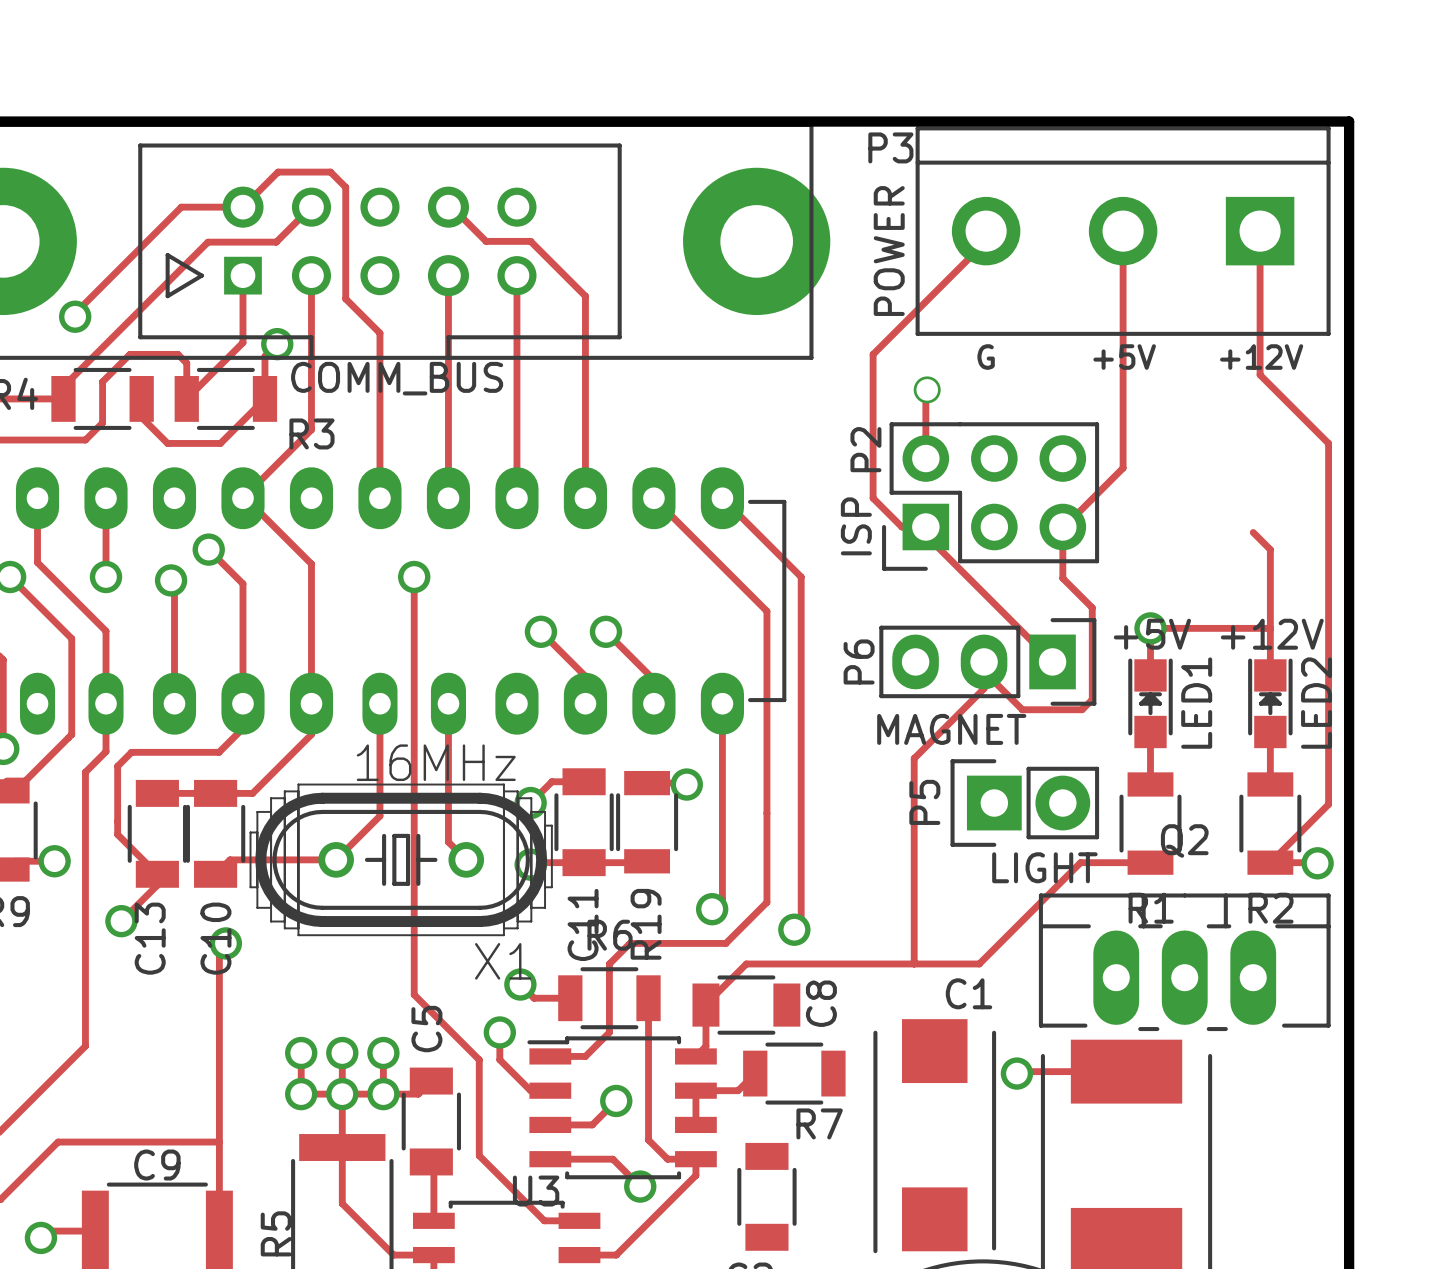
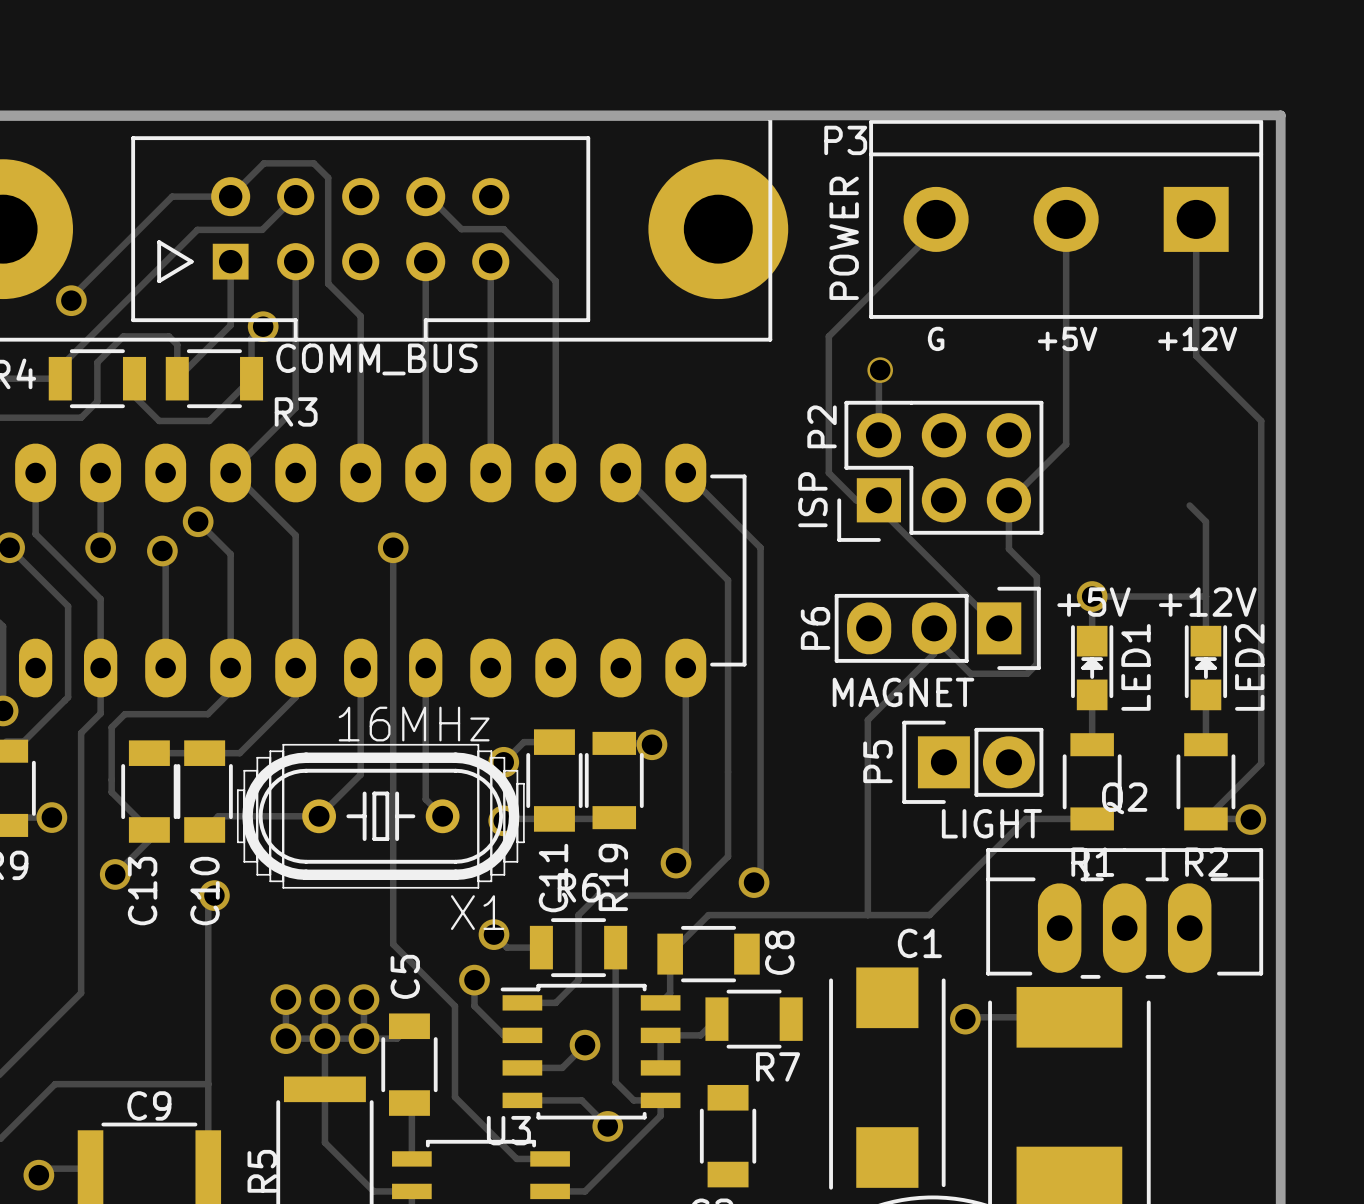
track: (540, 631) (585, 676) (585, 703) -> none
via: (540, 631) -> none
track: (605, 631) (653, 679) (653, 703) -> none
via: (605, 631) -> none

